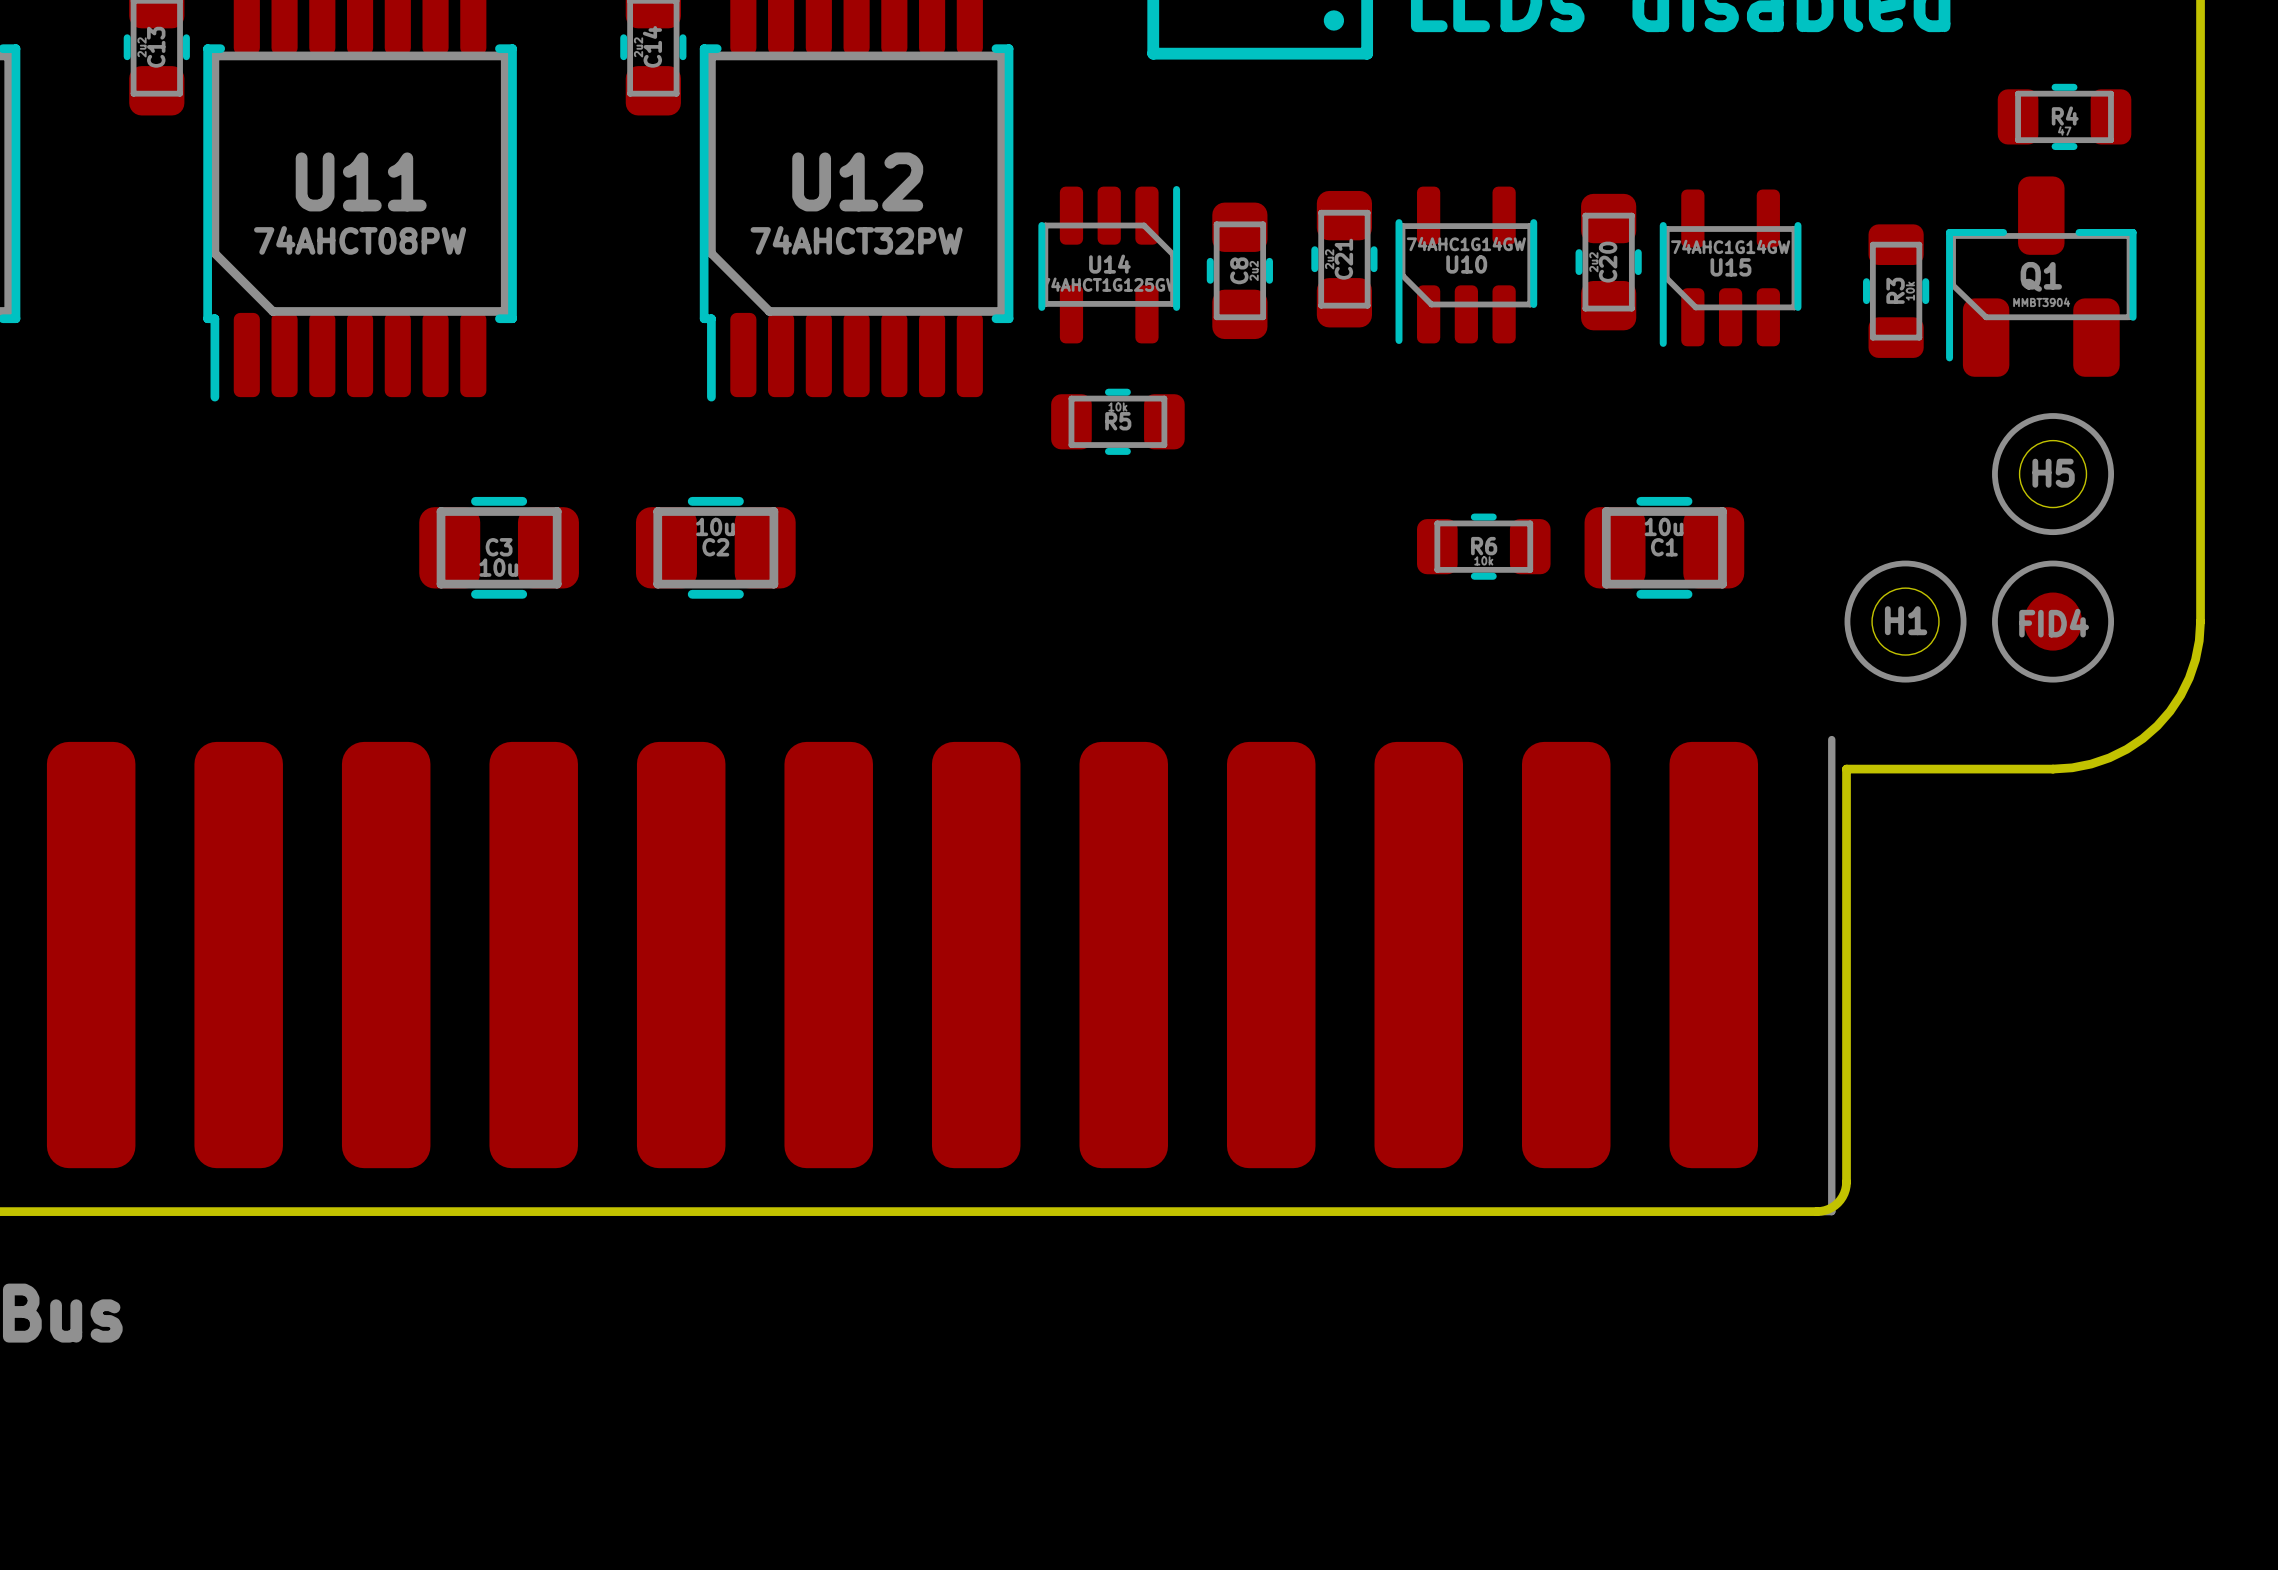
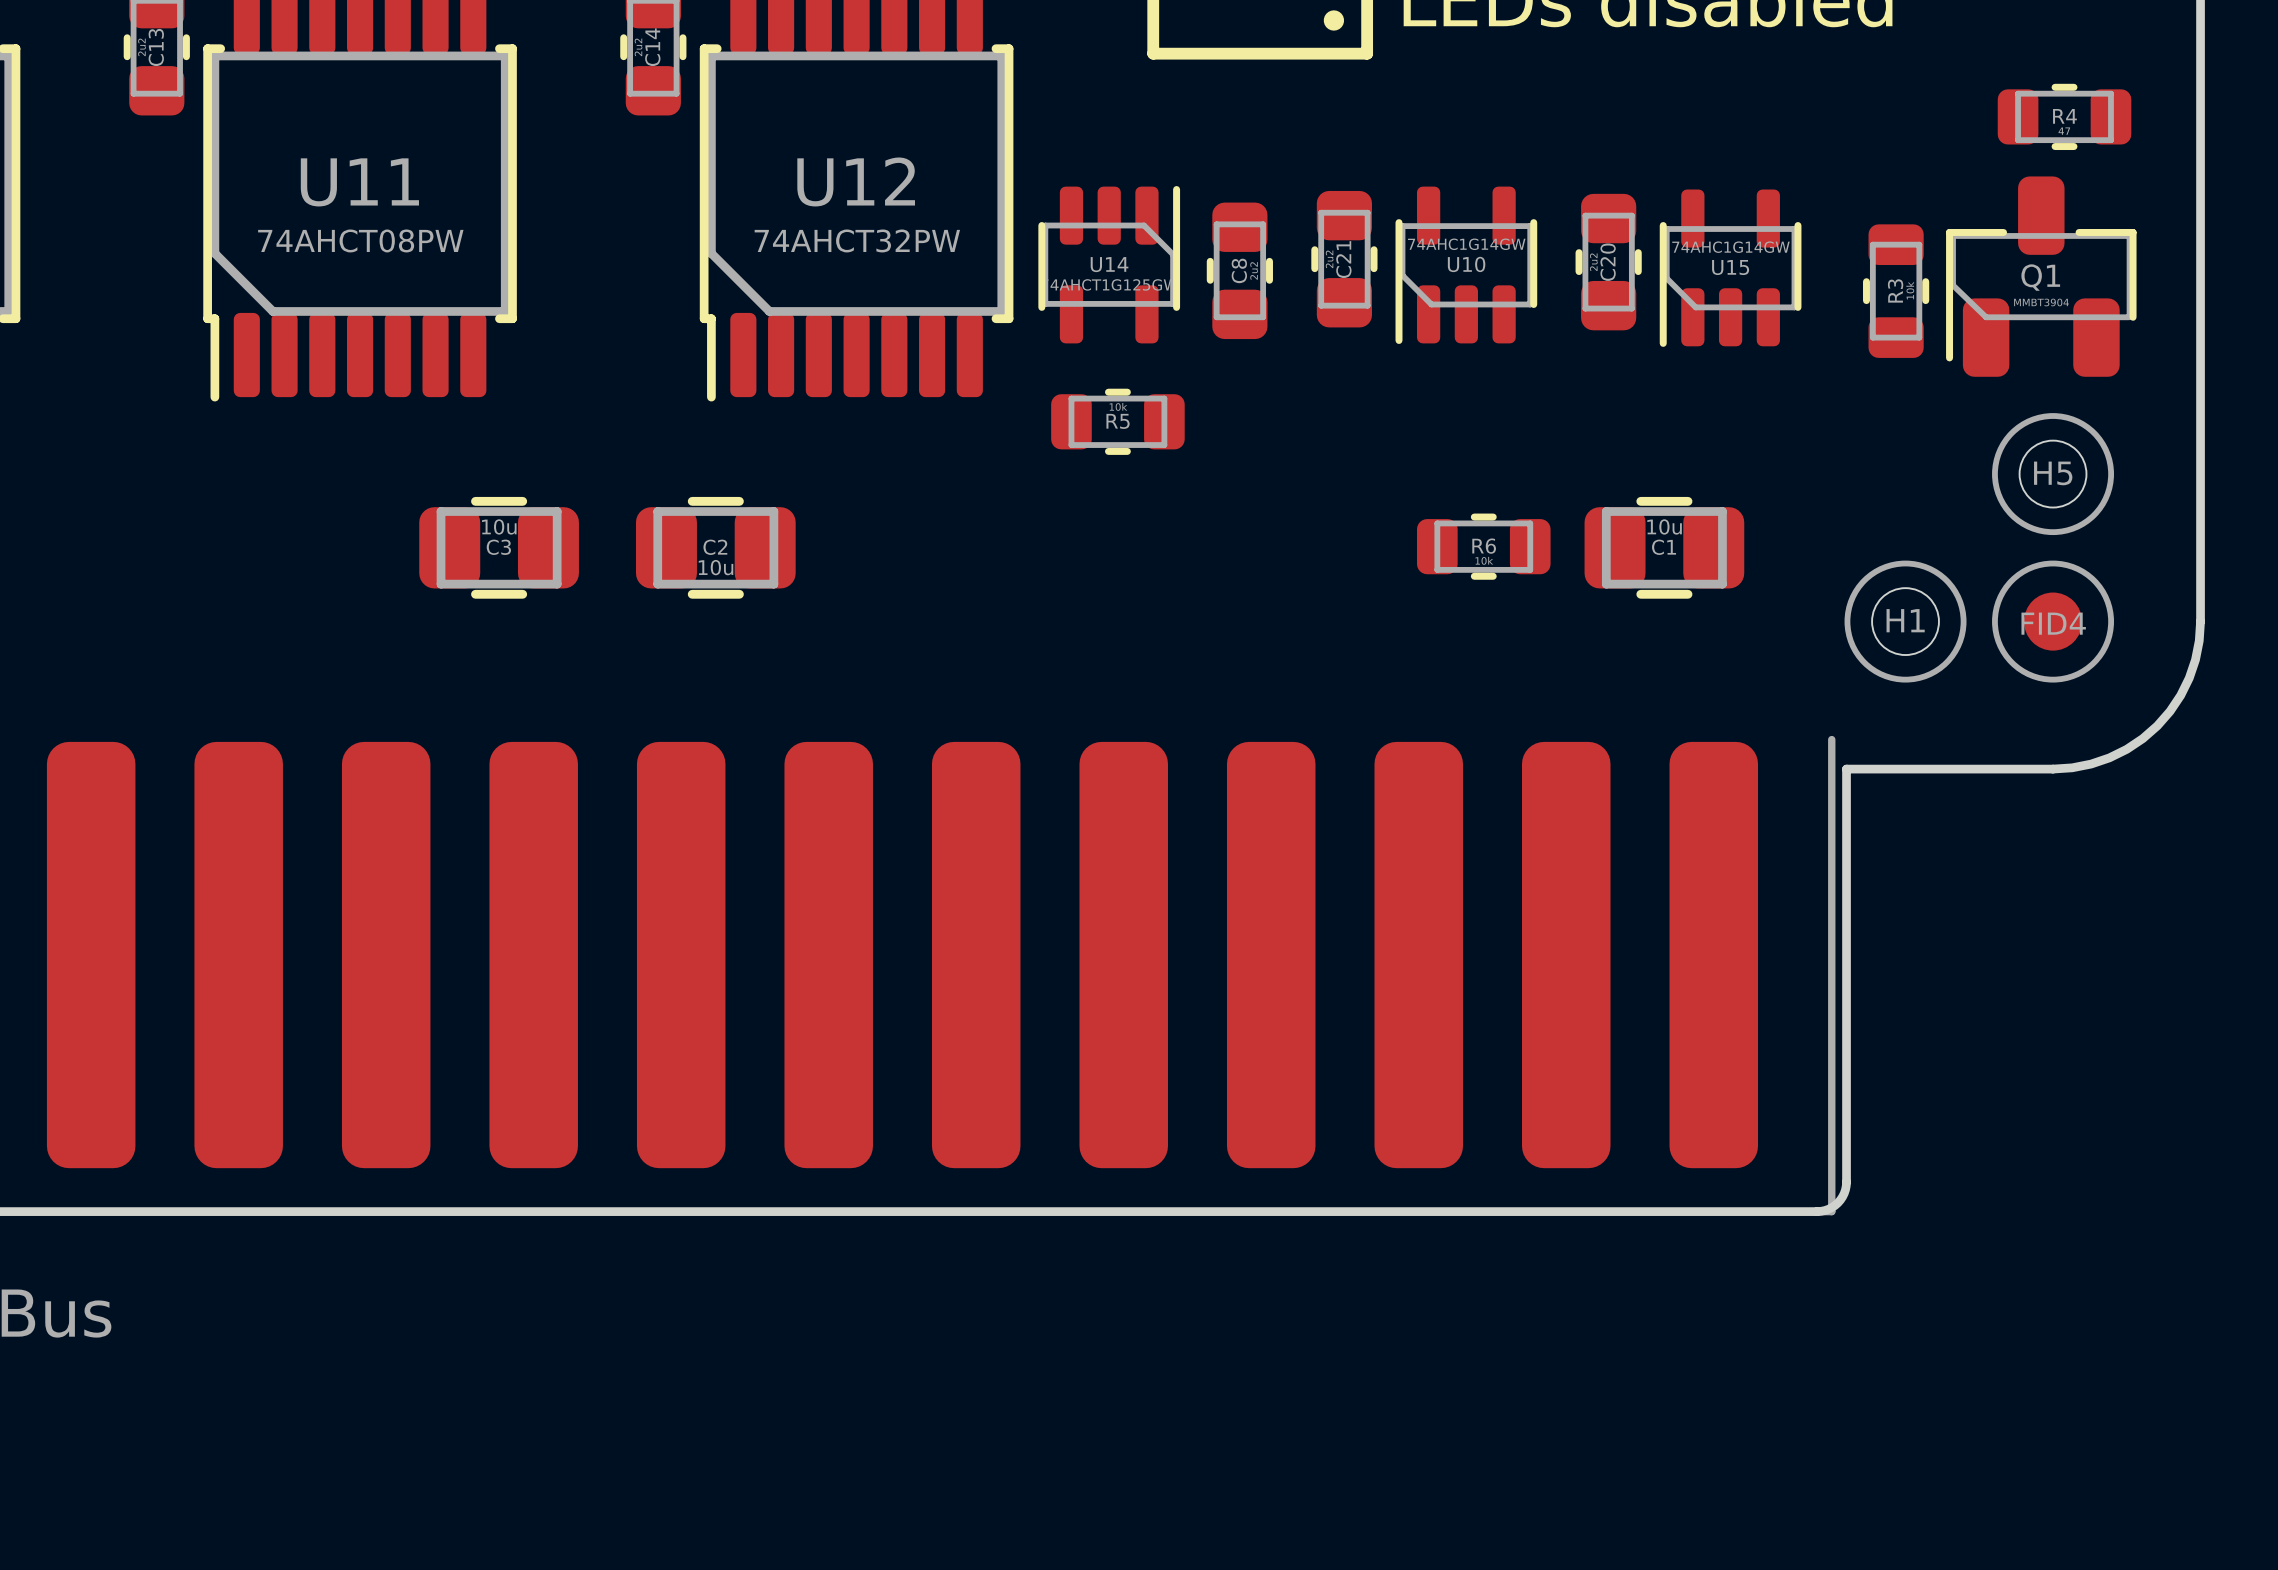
C2 value position: 10u (715, 526) -> 10u (716, 567)
C3 value position: 10u (498, 567) -> 10u (499, 526)

